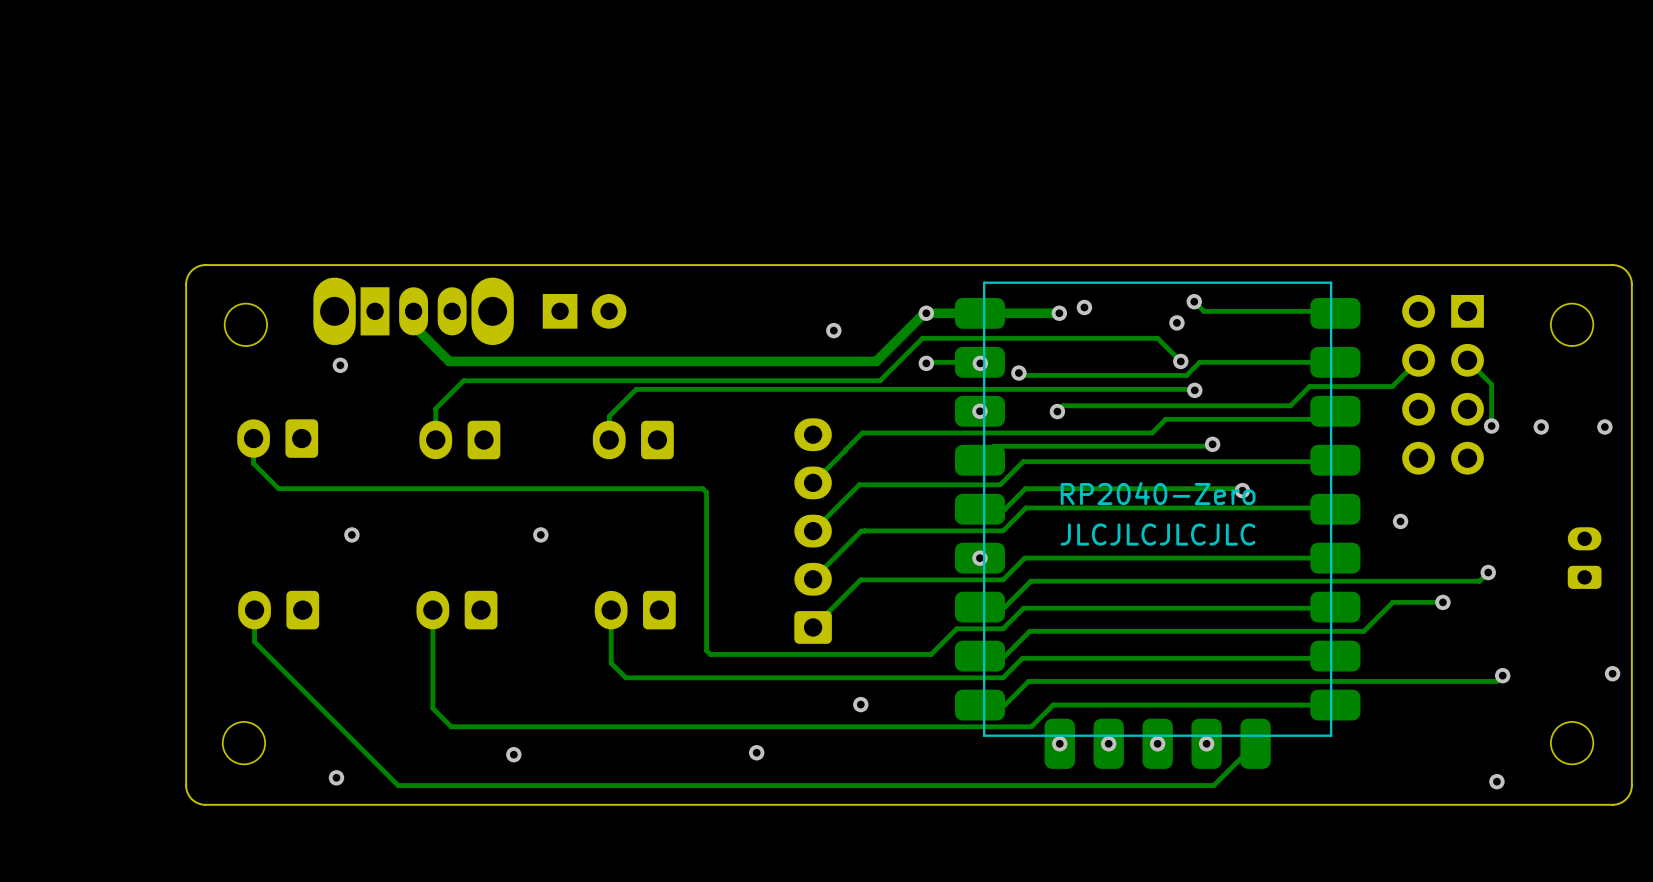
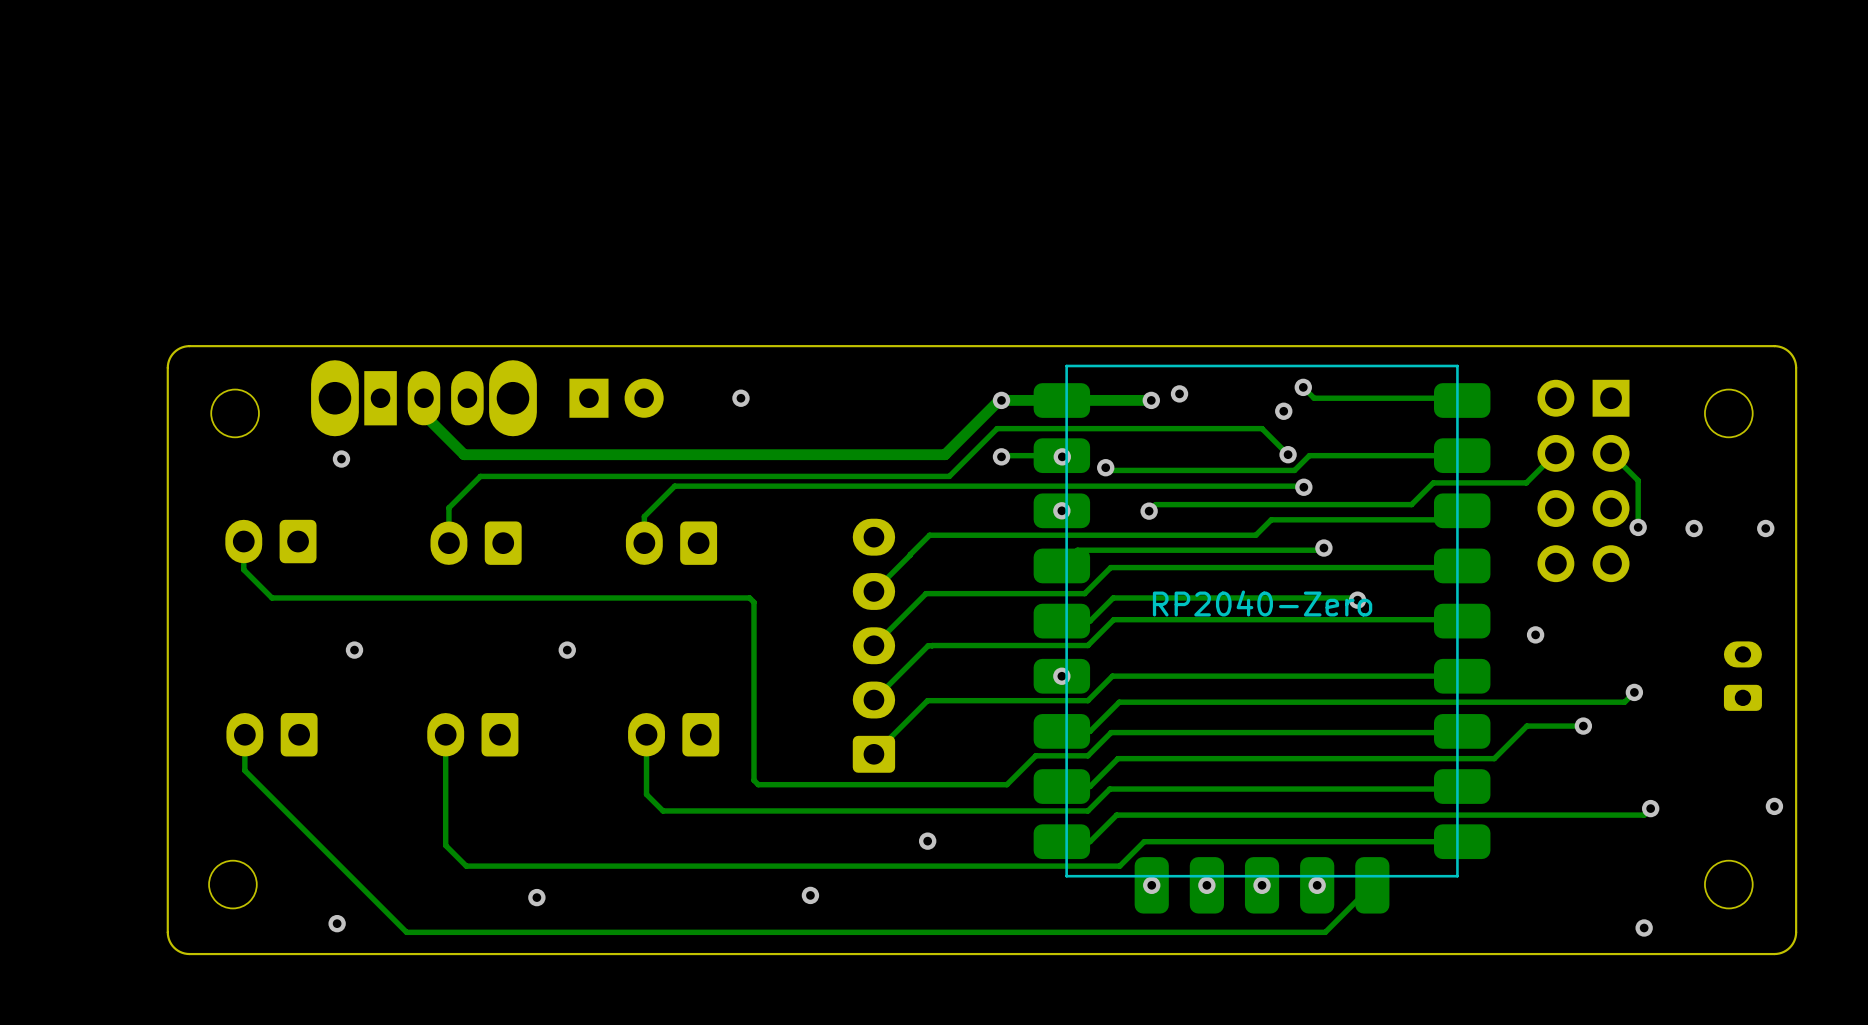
via: none -> (740, 398)
via: (833, 330) -> none
text: JLCJLCJLCJLC (1158, 534) -> none

